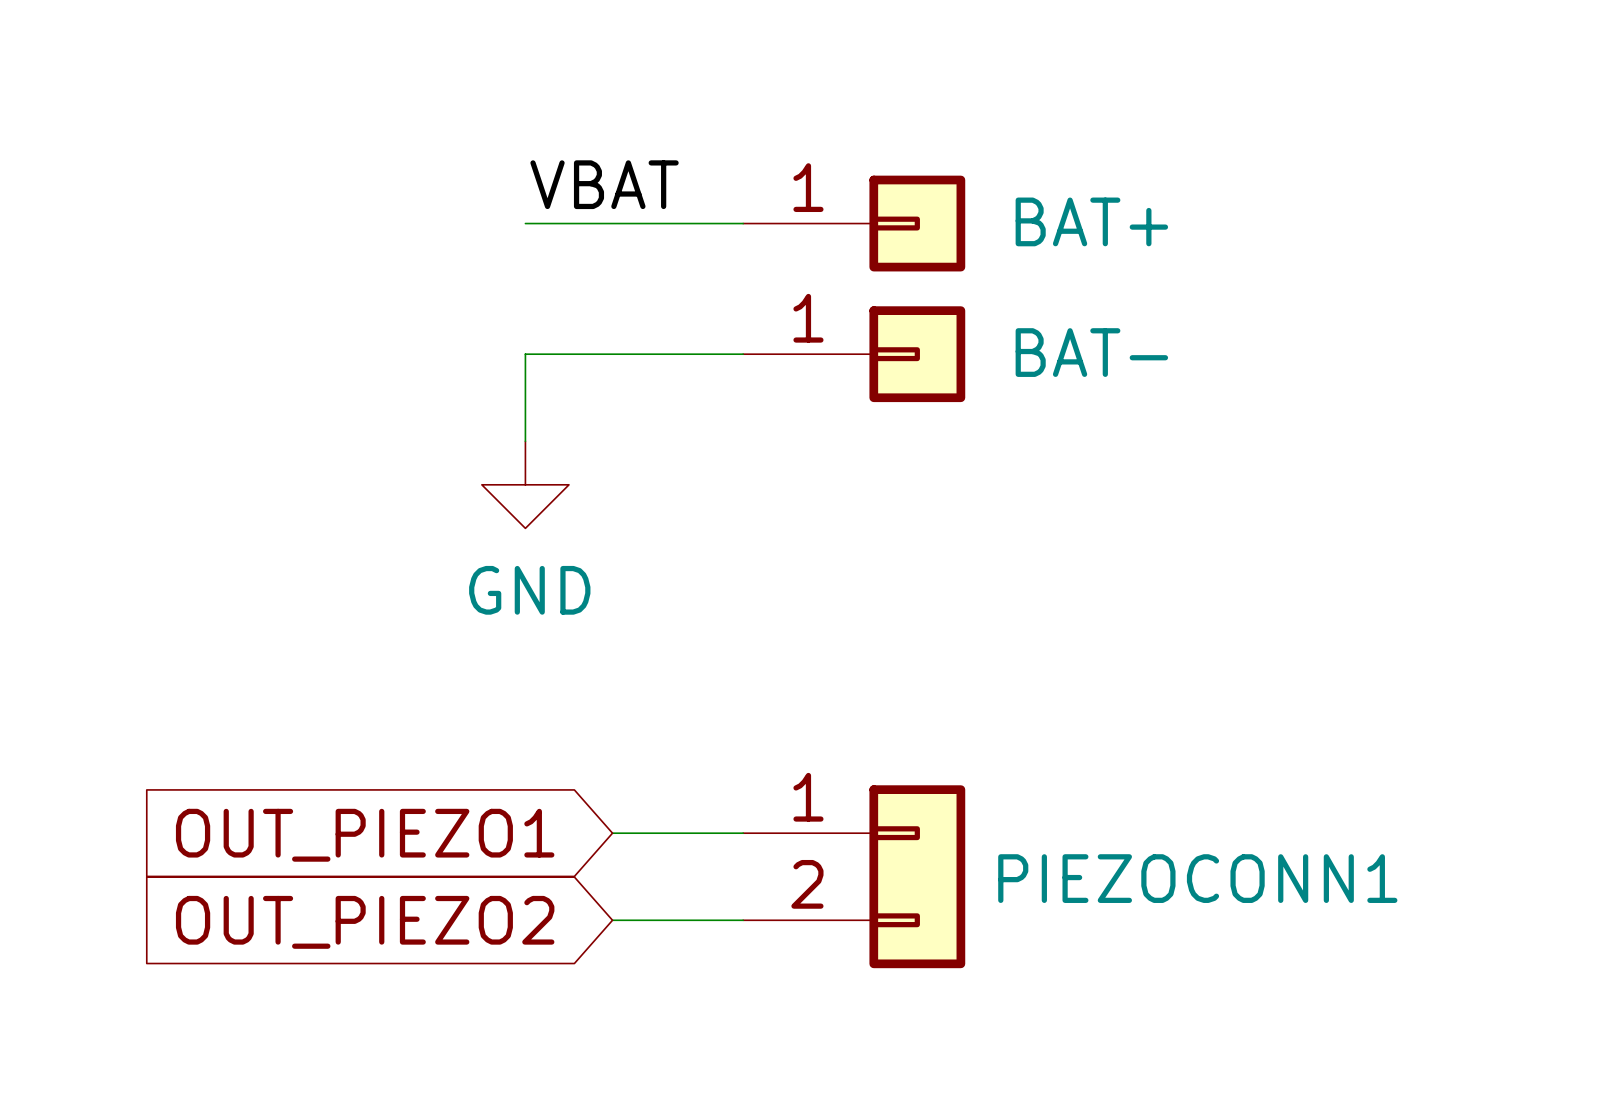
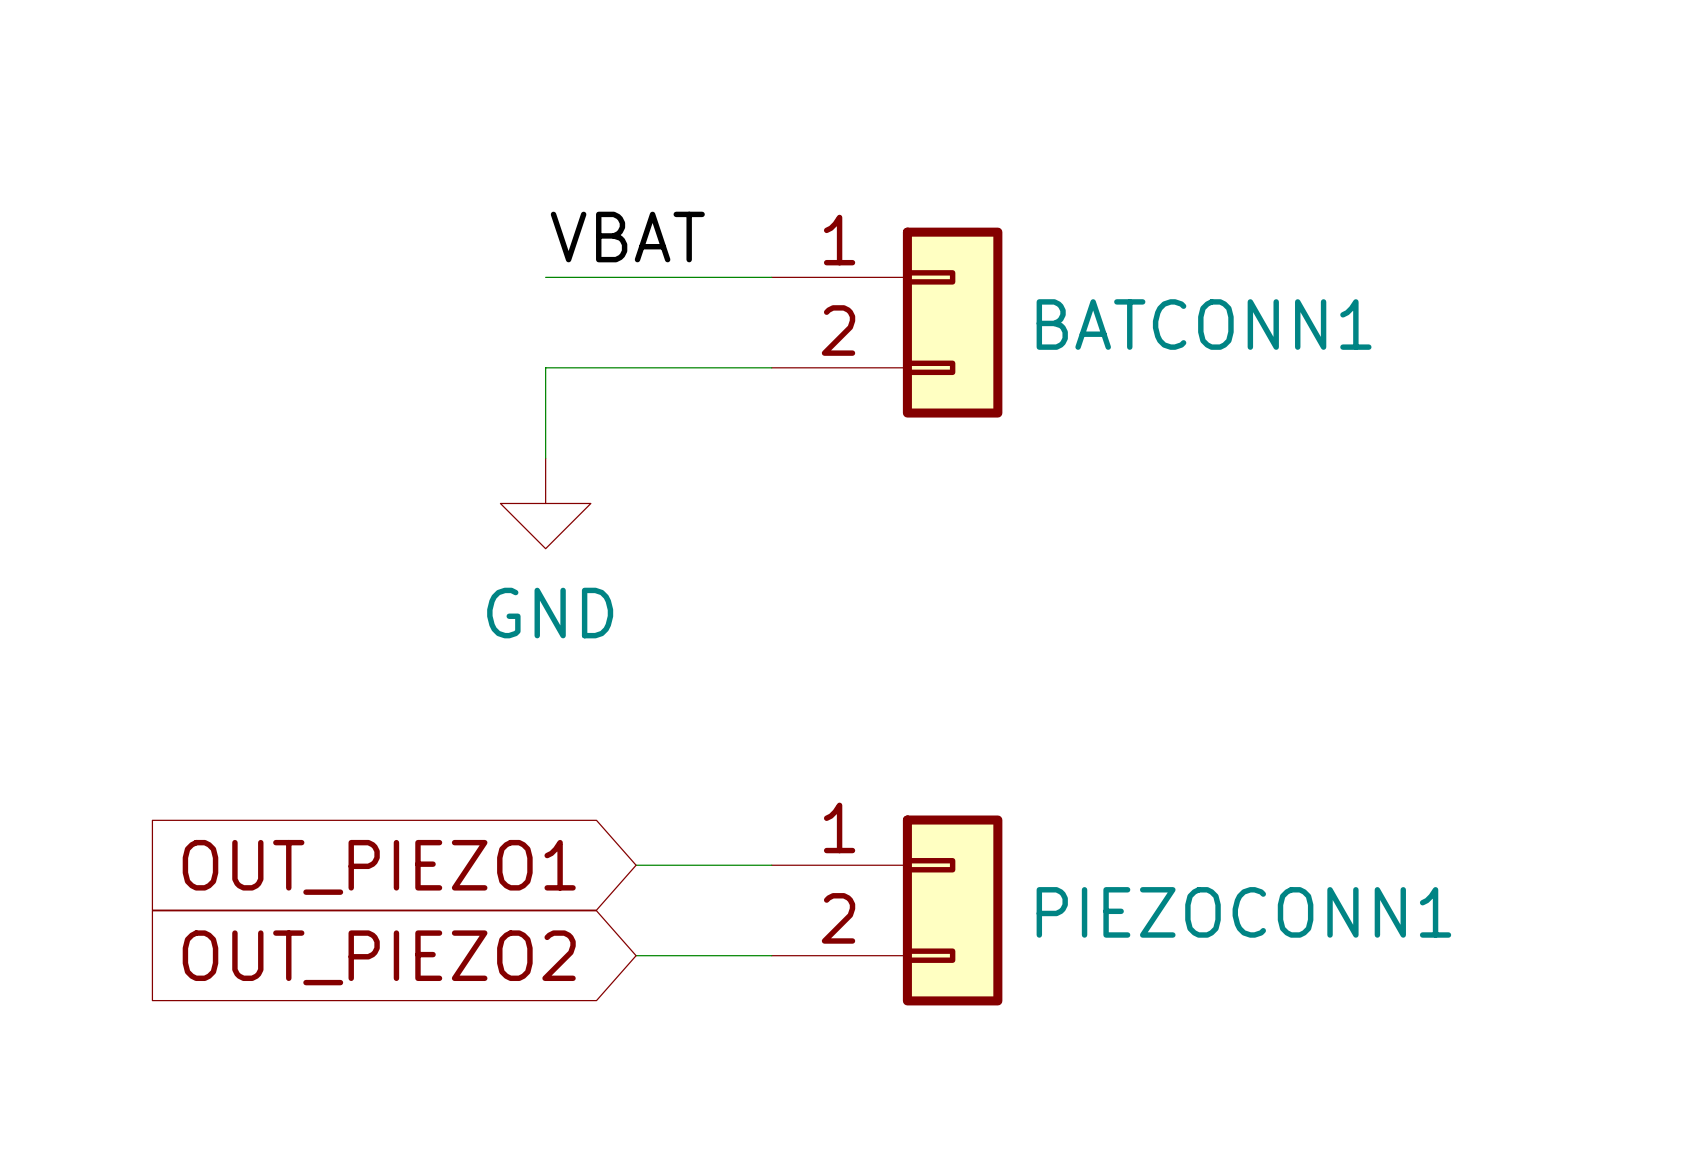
label position: VBAT (604, 184) -> VBAT (627, 237)
wire: (525, 223) (743, 223) -> (545, 277) (771, 277)
part: BAT+ (854, 223) -> none
BATCONN1: none -> (887, 322)
part: BAT- (854, 354) -> none

